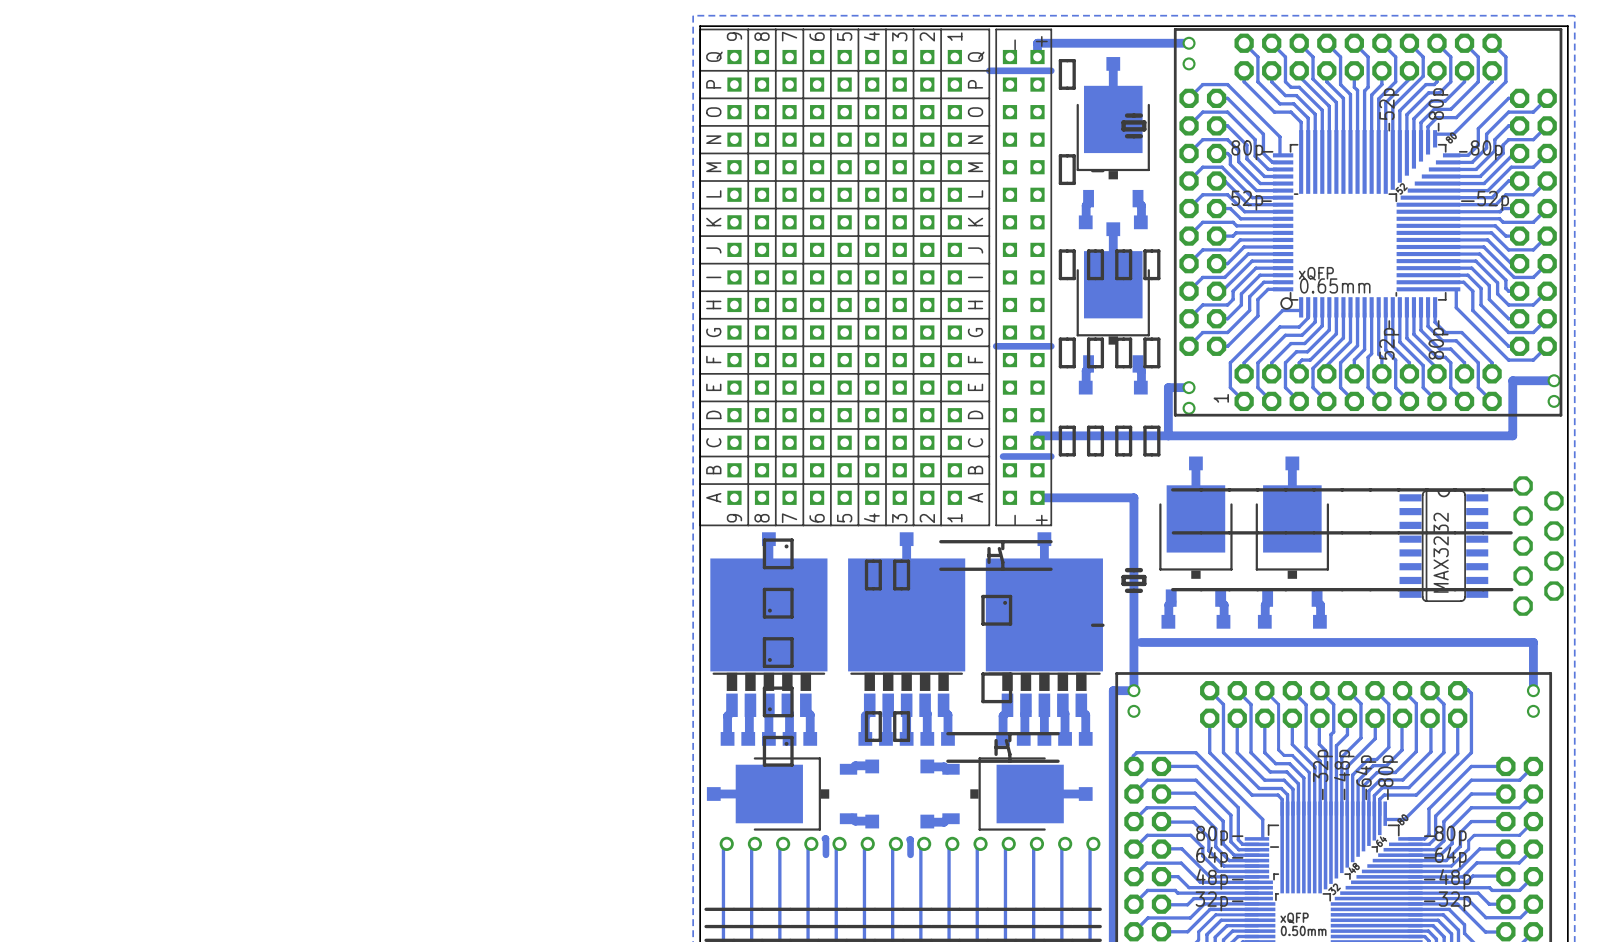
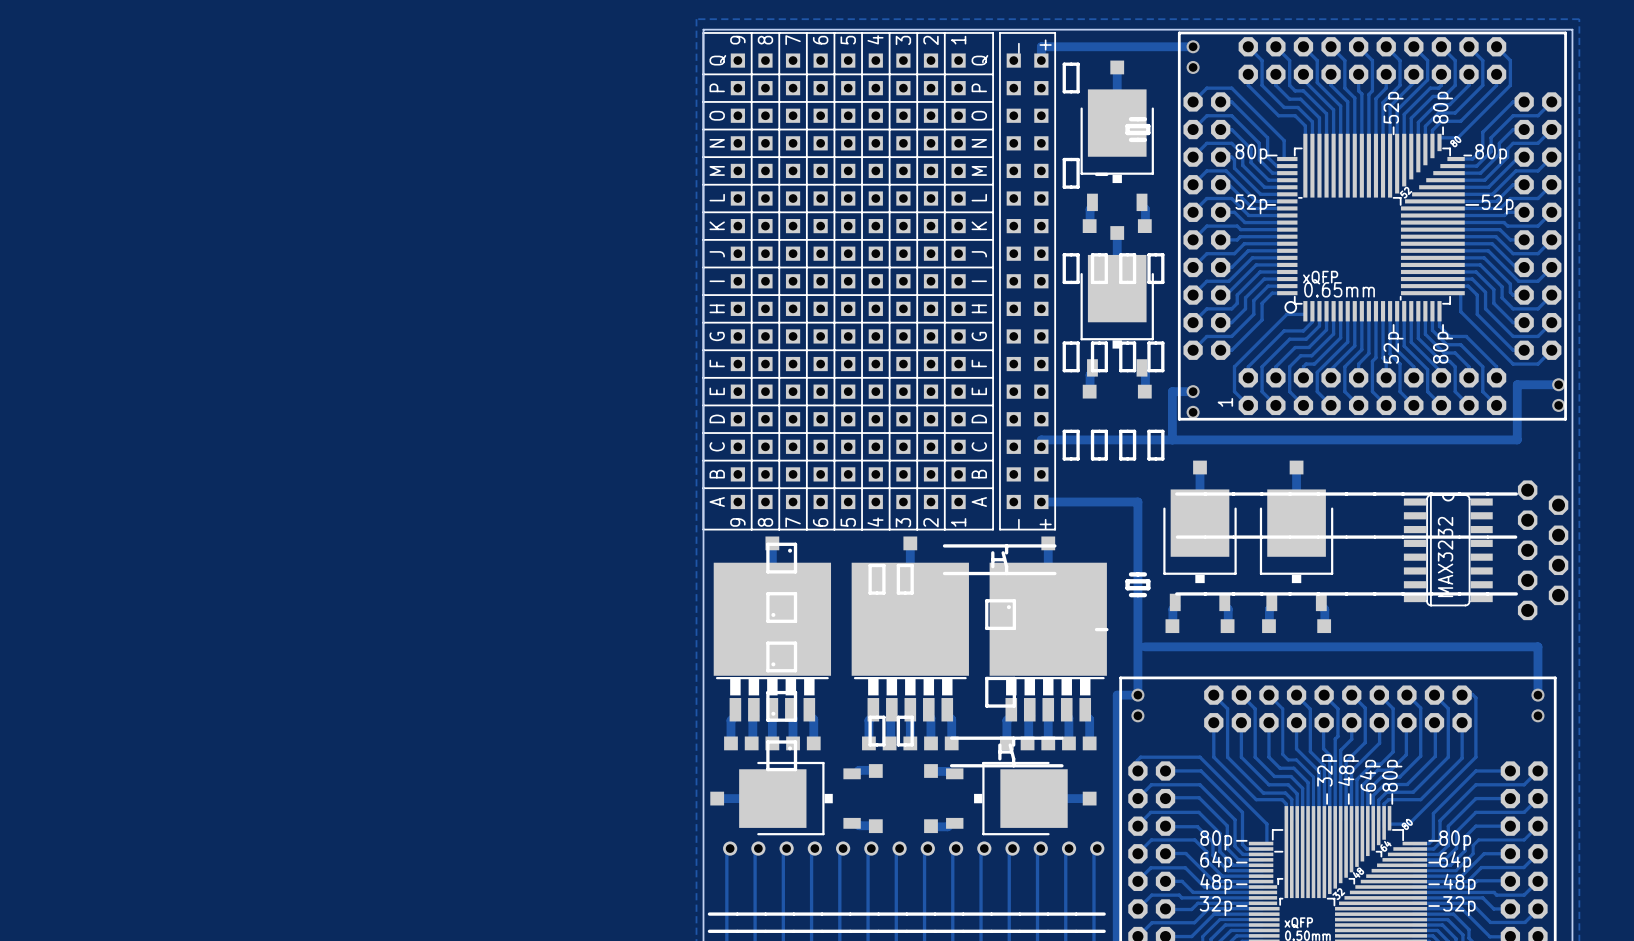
track: (1051, 70) (989, 70) -> none
track: (1051, 346) (996, 346) -> none
track: (1051, 456) (1003, 456) -> none
track: (824, 838) (825, 854) -> none
track: (909, 839) (910, 854) -> none

